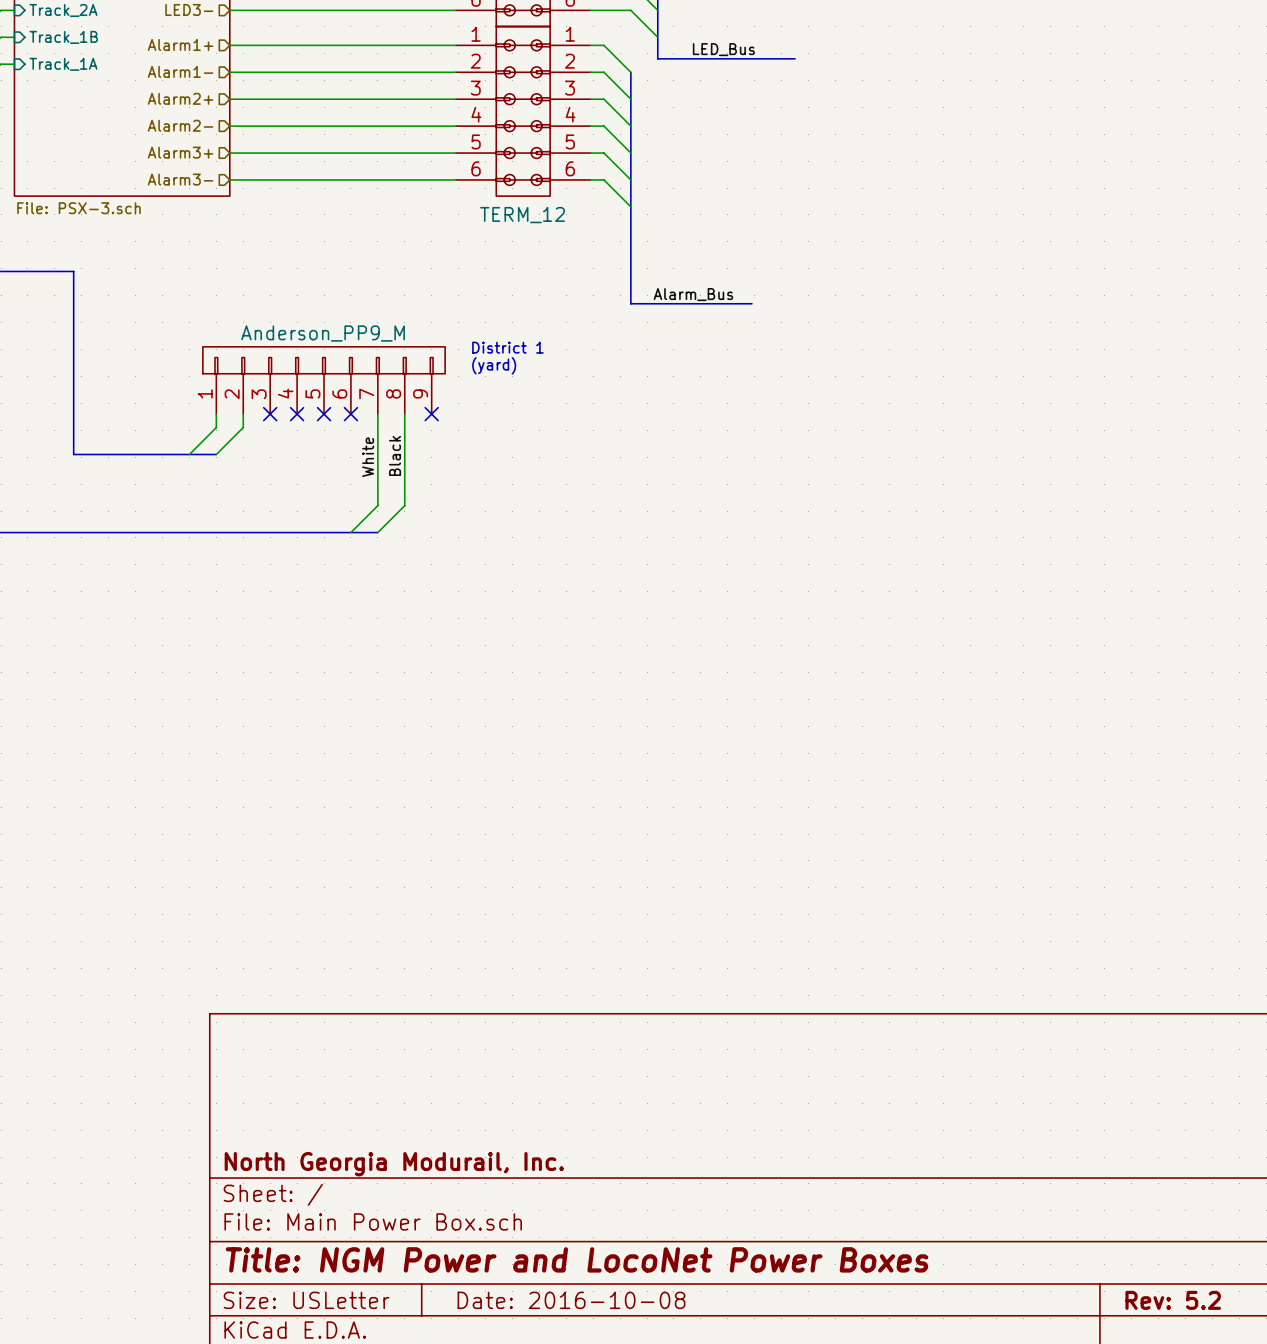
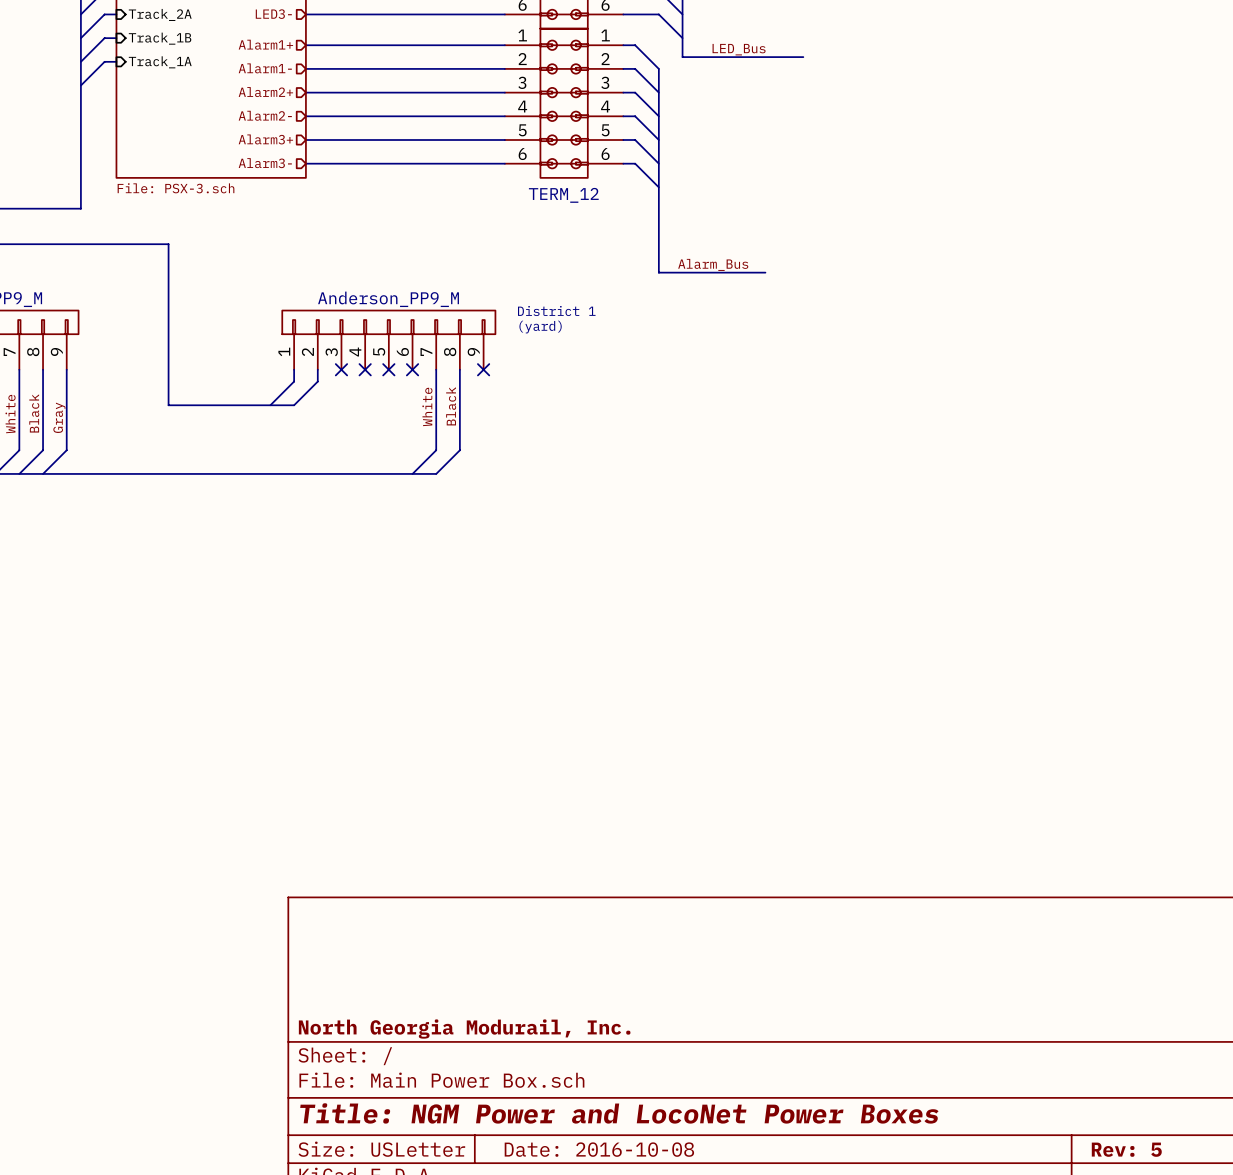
title block: Rev: 5.2 (1173, 1300) -> Rev: 5 (1126, 1149)

